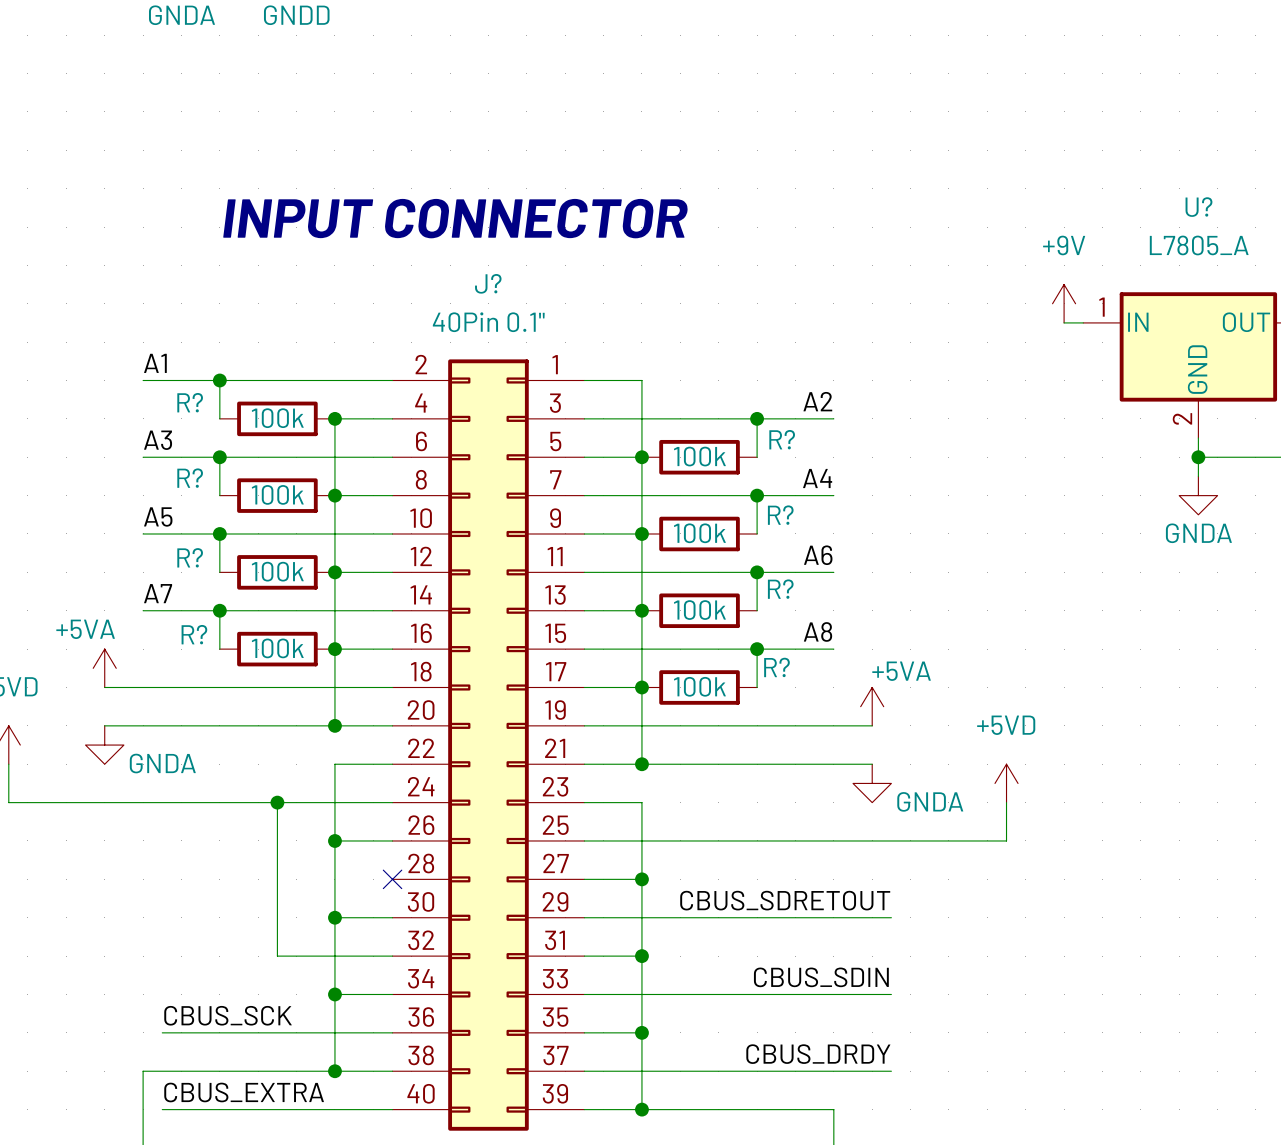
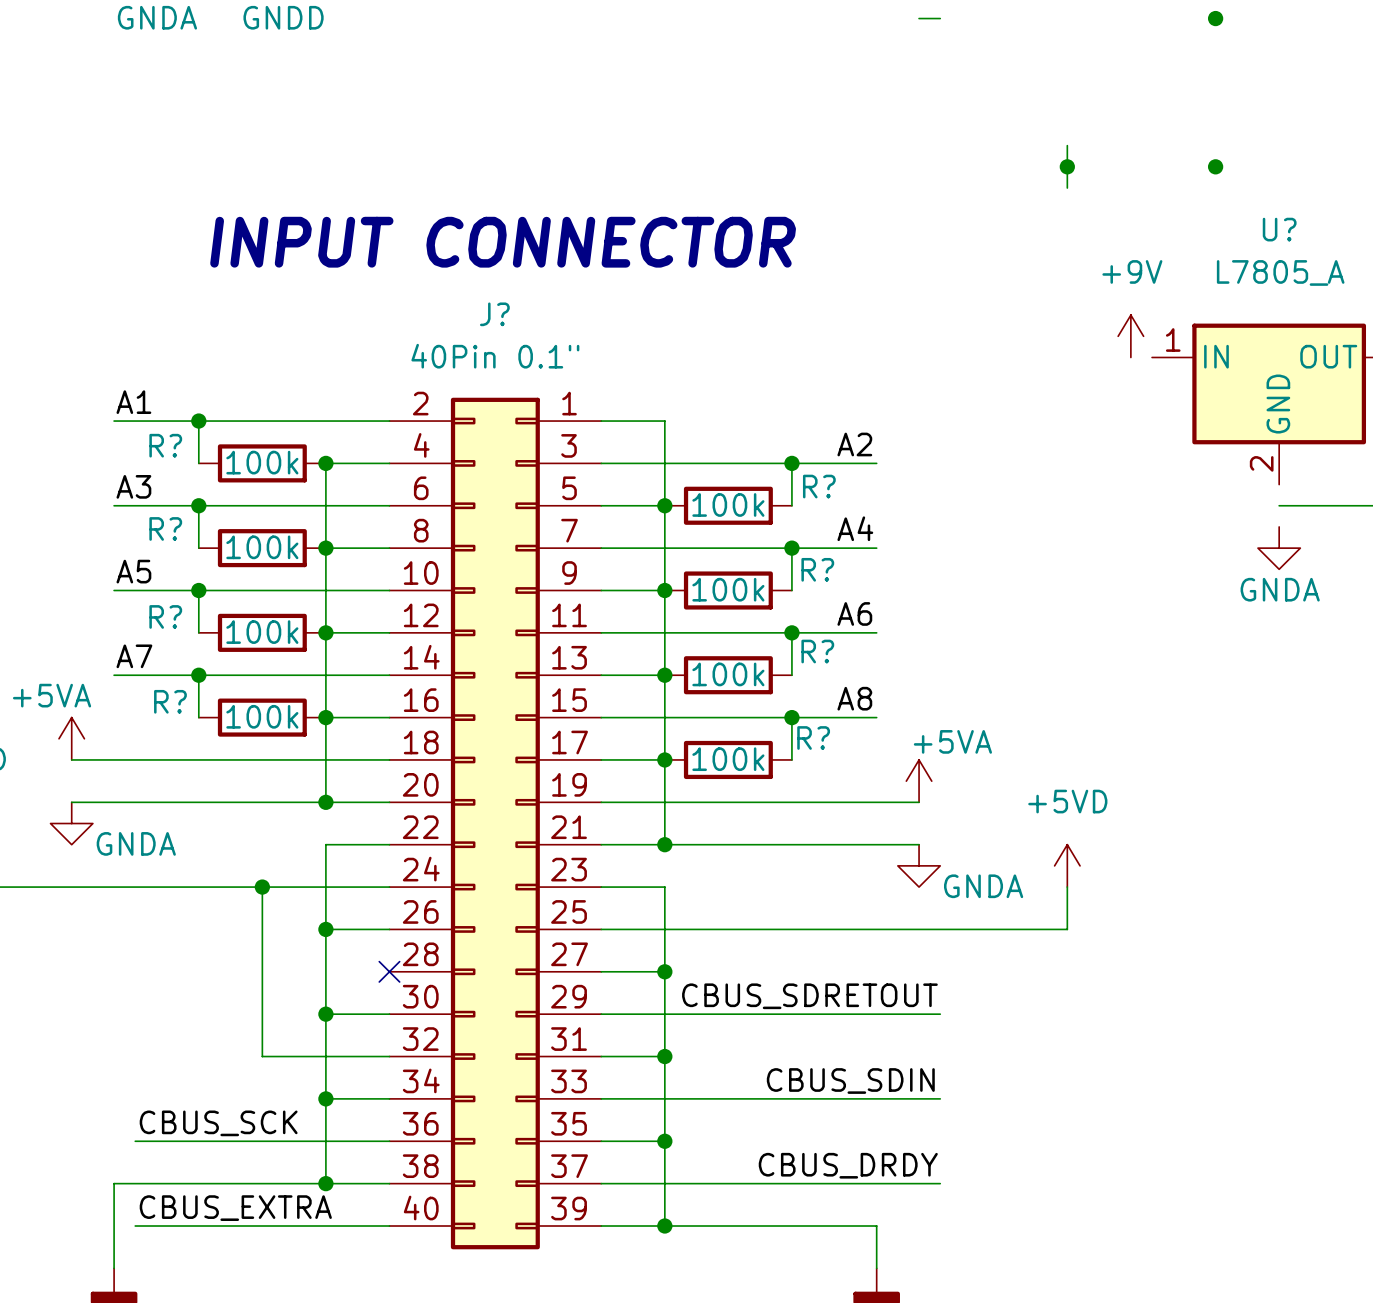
junction: none -> (1215, 18)
junction: none -> (1067, 166)
junction: none -> (1215, 166)
wire: (1064, 322) (1083, 322) -> (919, 18) (940, 18)
wire: (1198, 438) (1198, 476) -> (1067, 145) (1067, 188)
junction: (1198, 457) -> none

